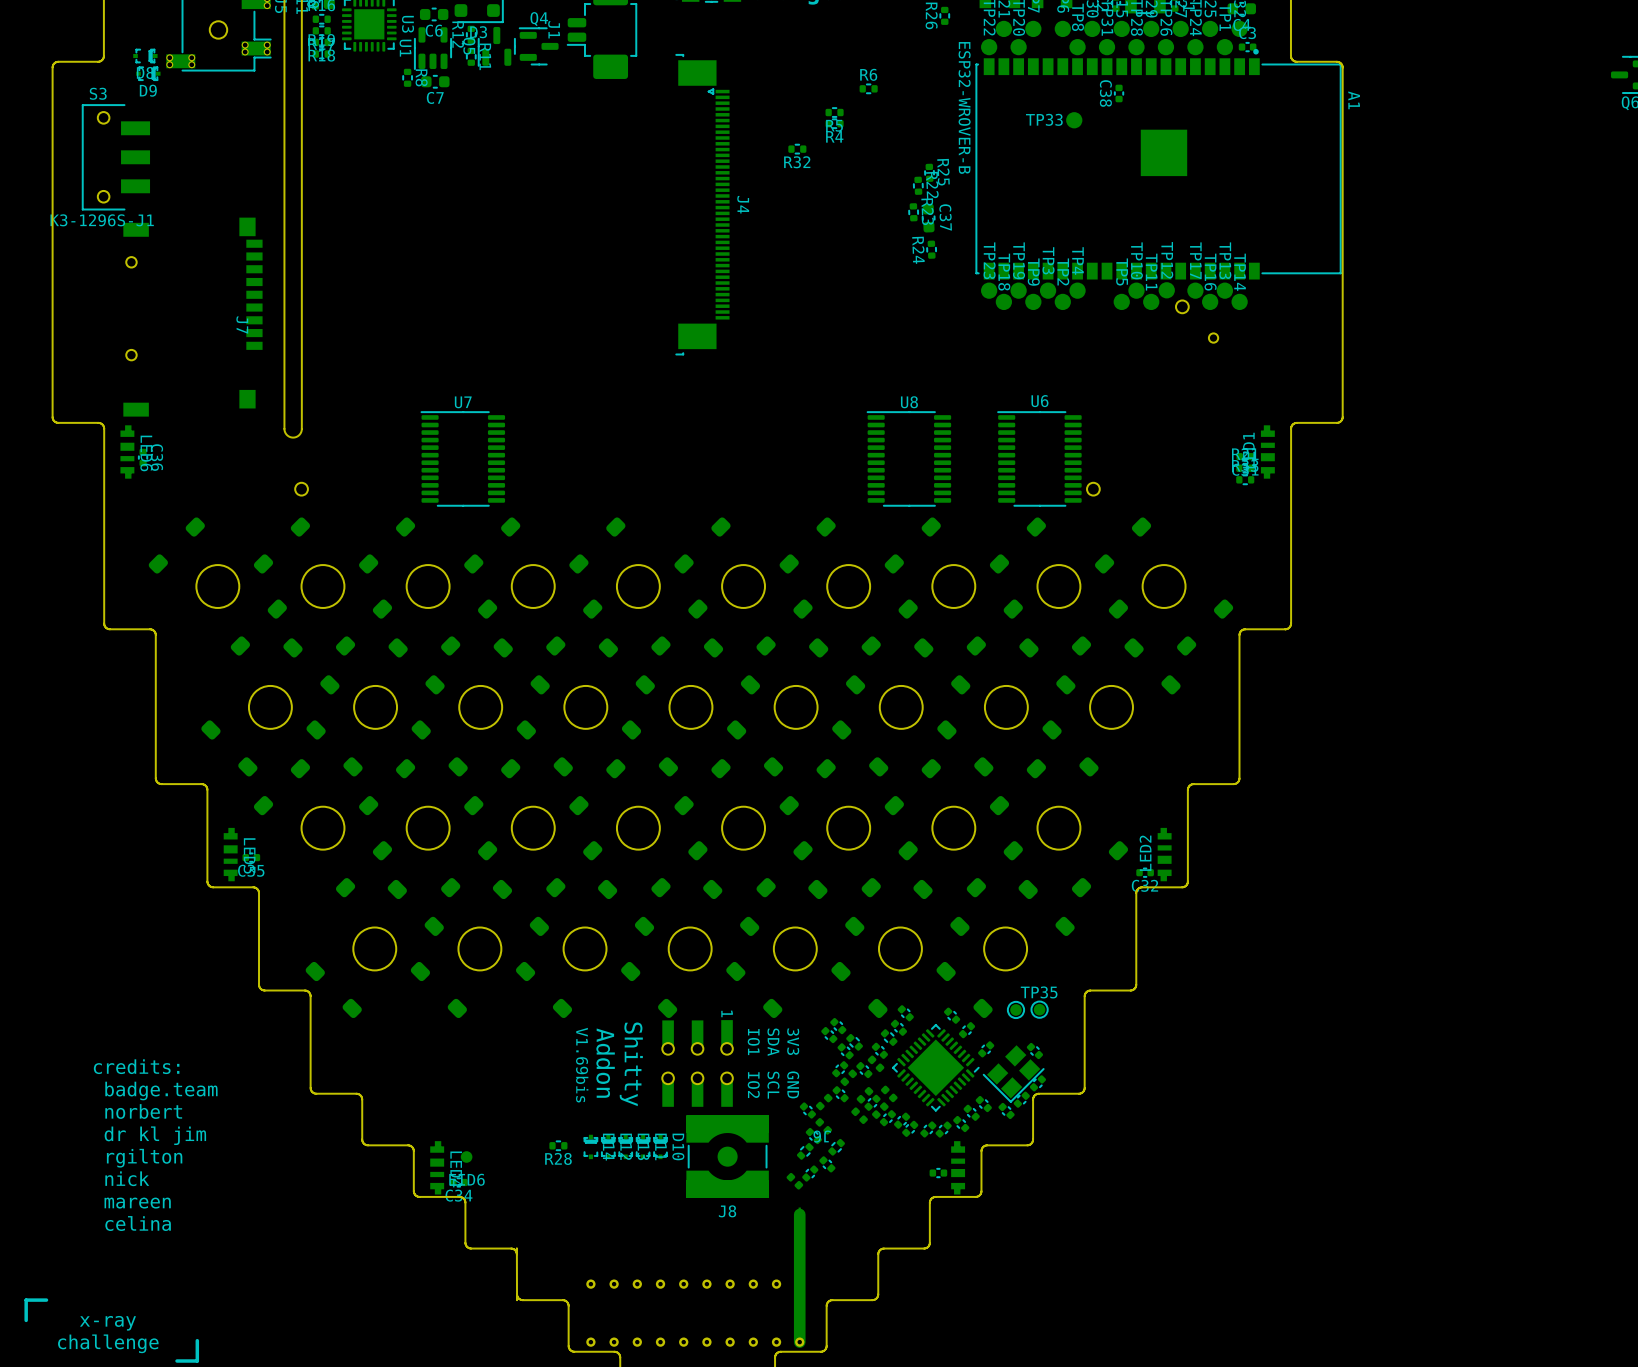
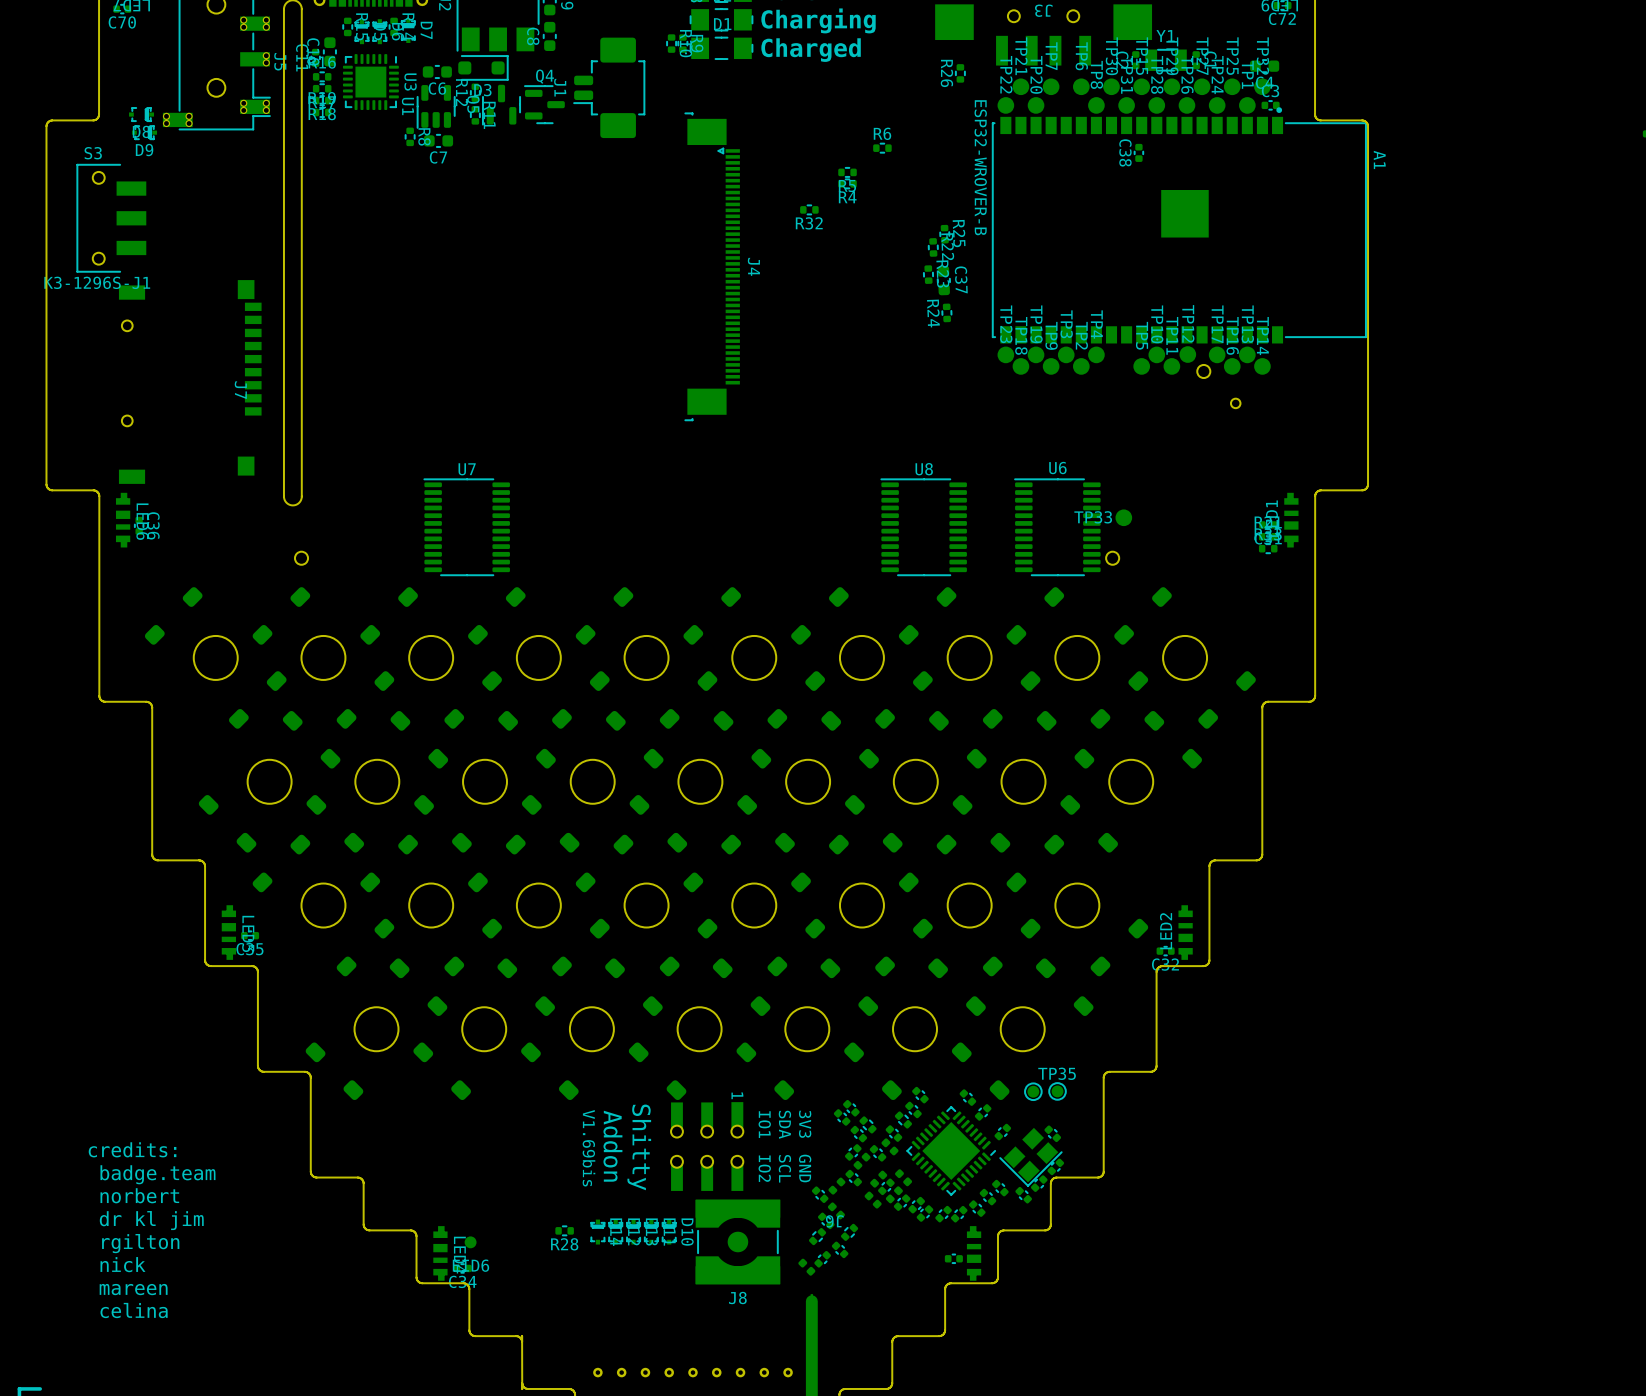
TP33 position: (1074, 120) -> (1123, 517)

